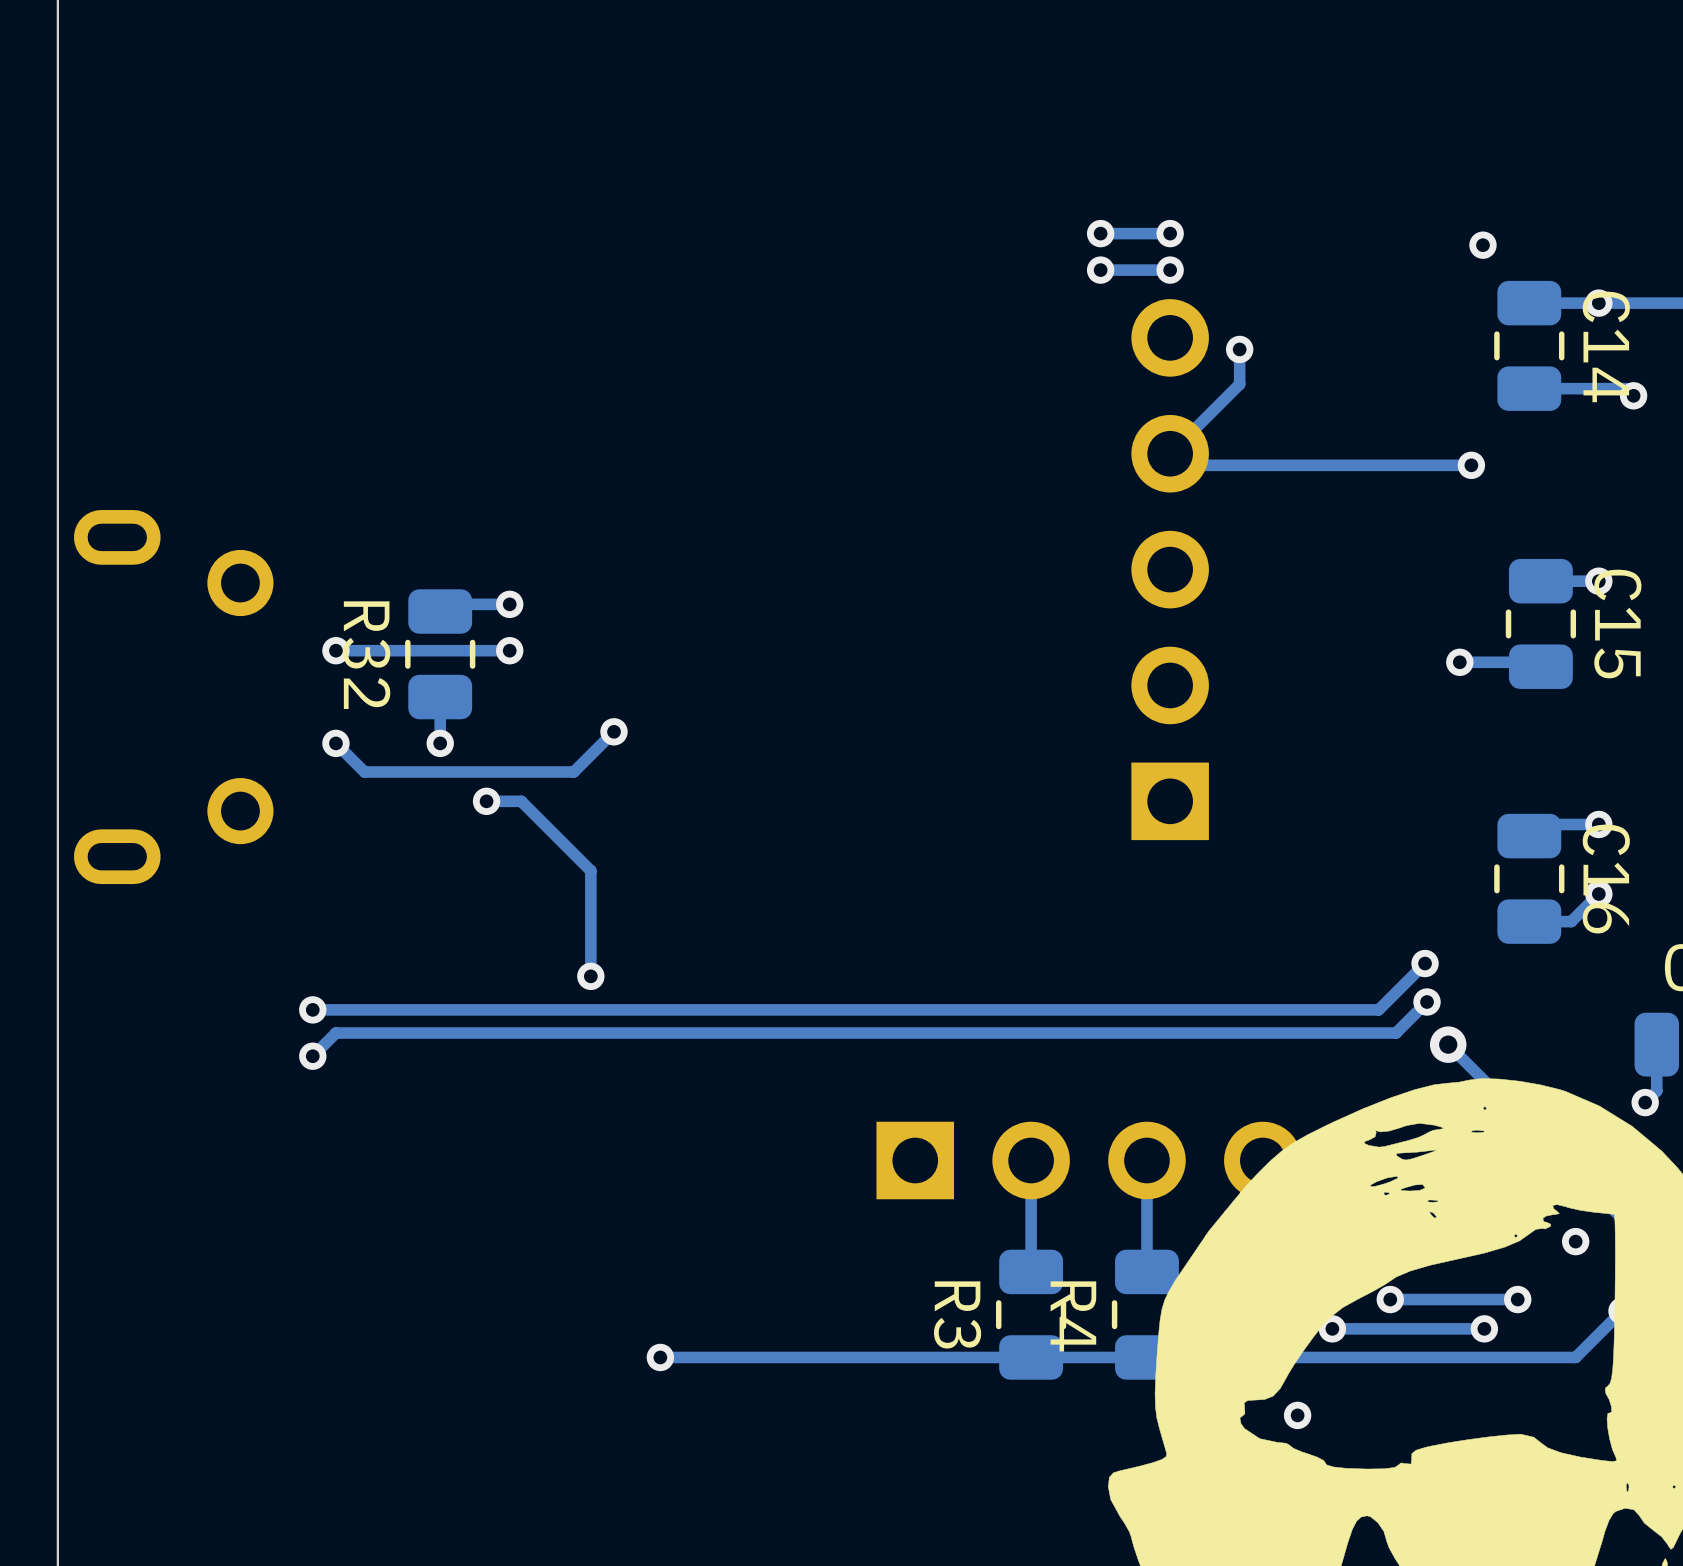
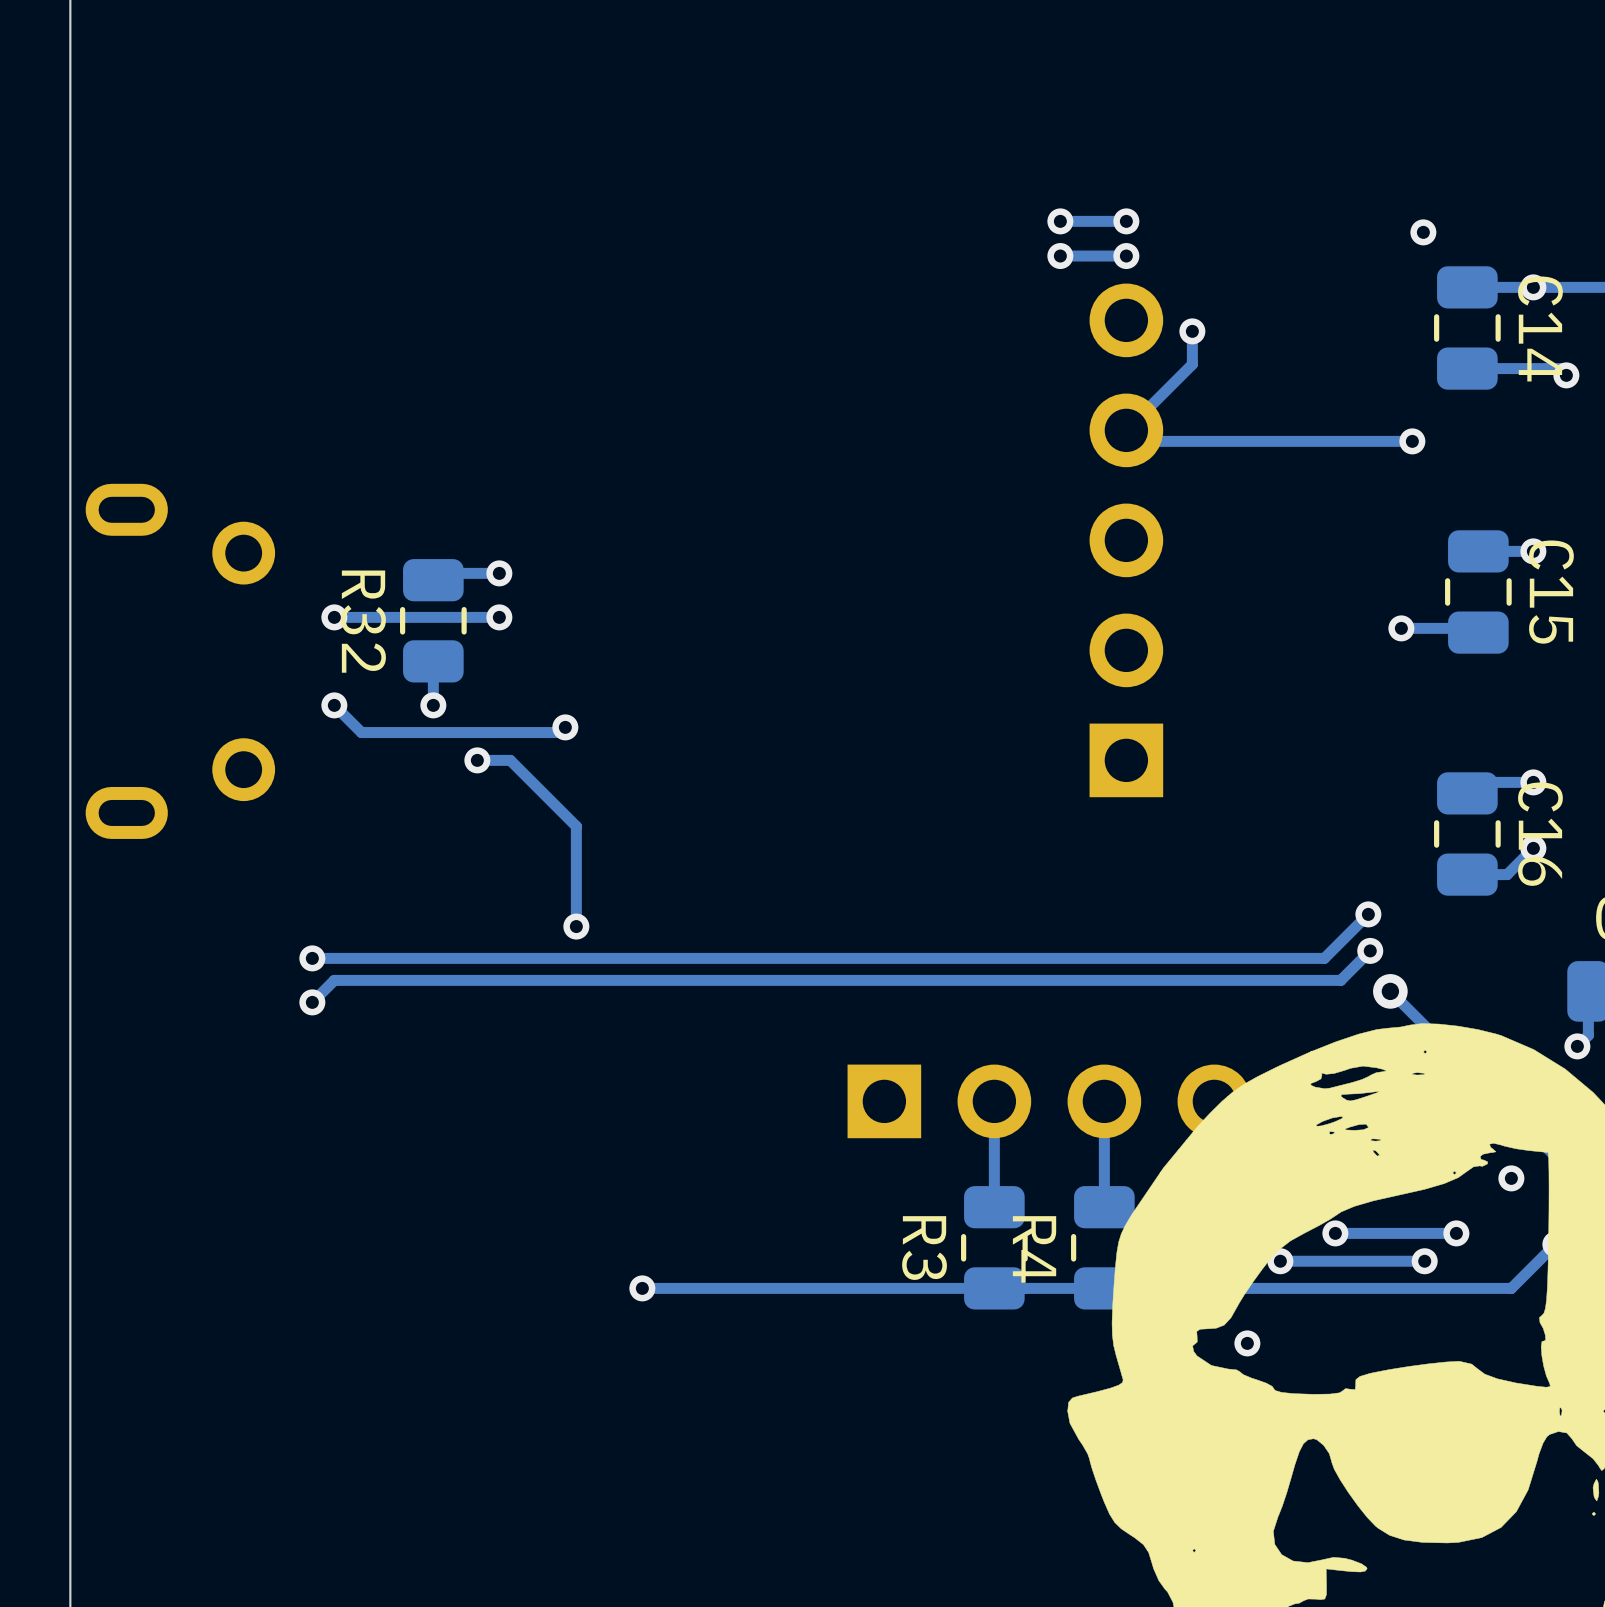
track: (614, 731) (579, 766) -> none
via position: (614, 731) -> (565, 727)

